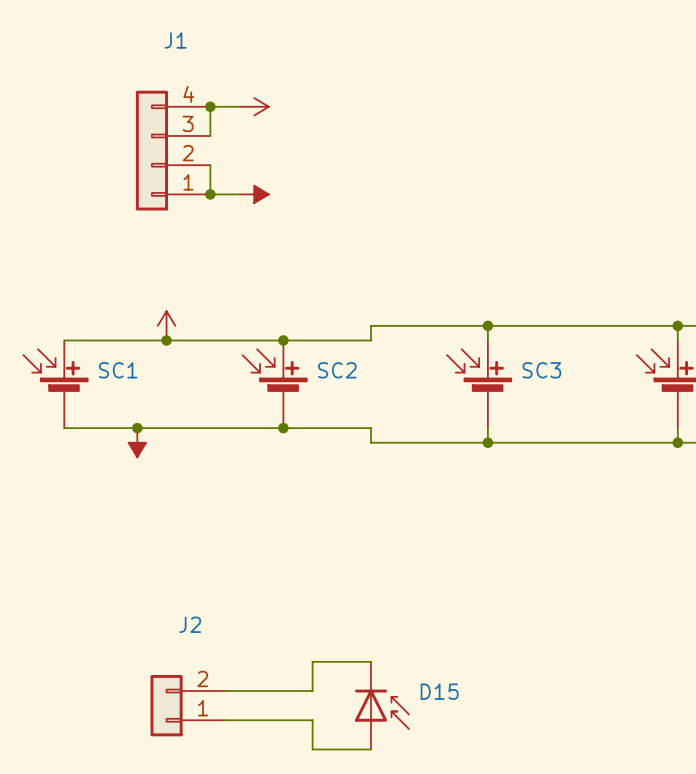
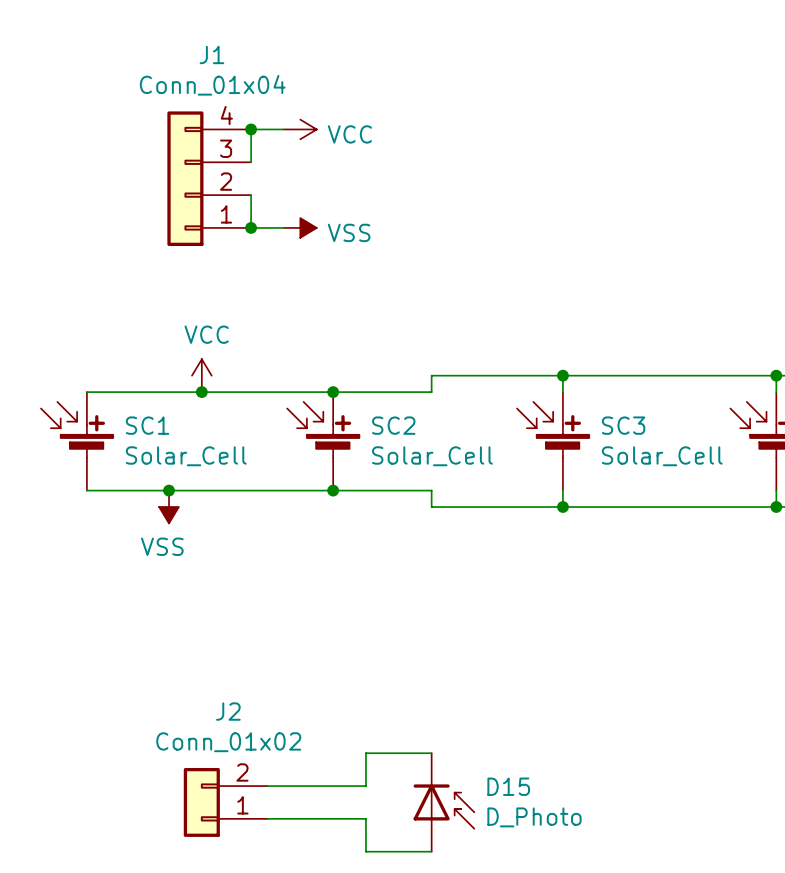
J1 value: none -> Conn_01x04 (212, 85)
power symbol text: none -> VCC (349, 134)
power symbol text: none -> VSS (349, 232)
power symbol text: none -> VCC (206, 334)
SC1 value: none -> Solar_Cell (186, 456)
SC2 value: none -> Solar_Cell (432, 456)
SC3 value: none -> Solar_Cell (662, 456)
power symbol text: none -> VSS (162, 546)
J2 value: none -> Conn_01x02 (228, 742)
D15 value: none -> D_Photo (534, 817)

